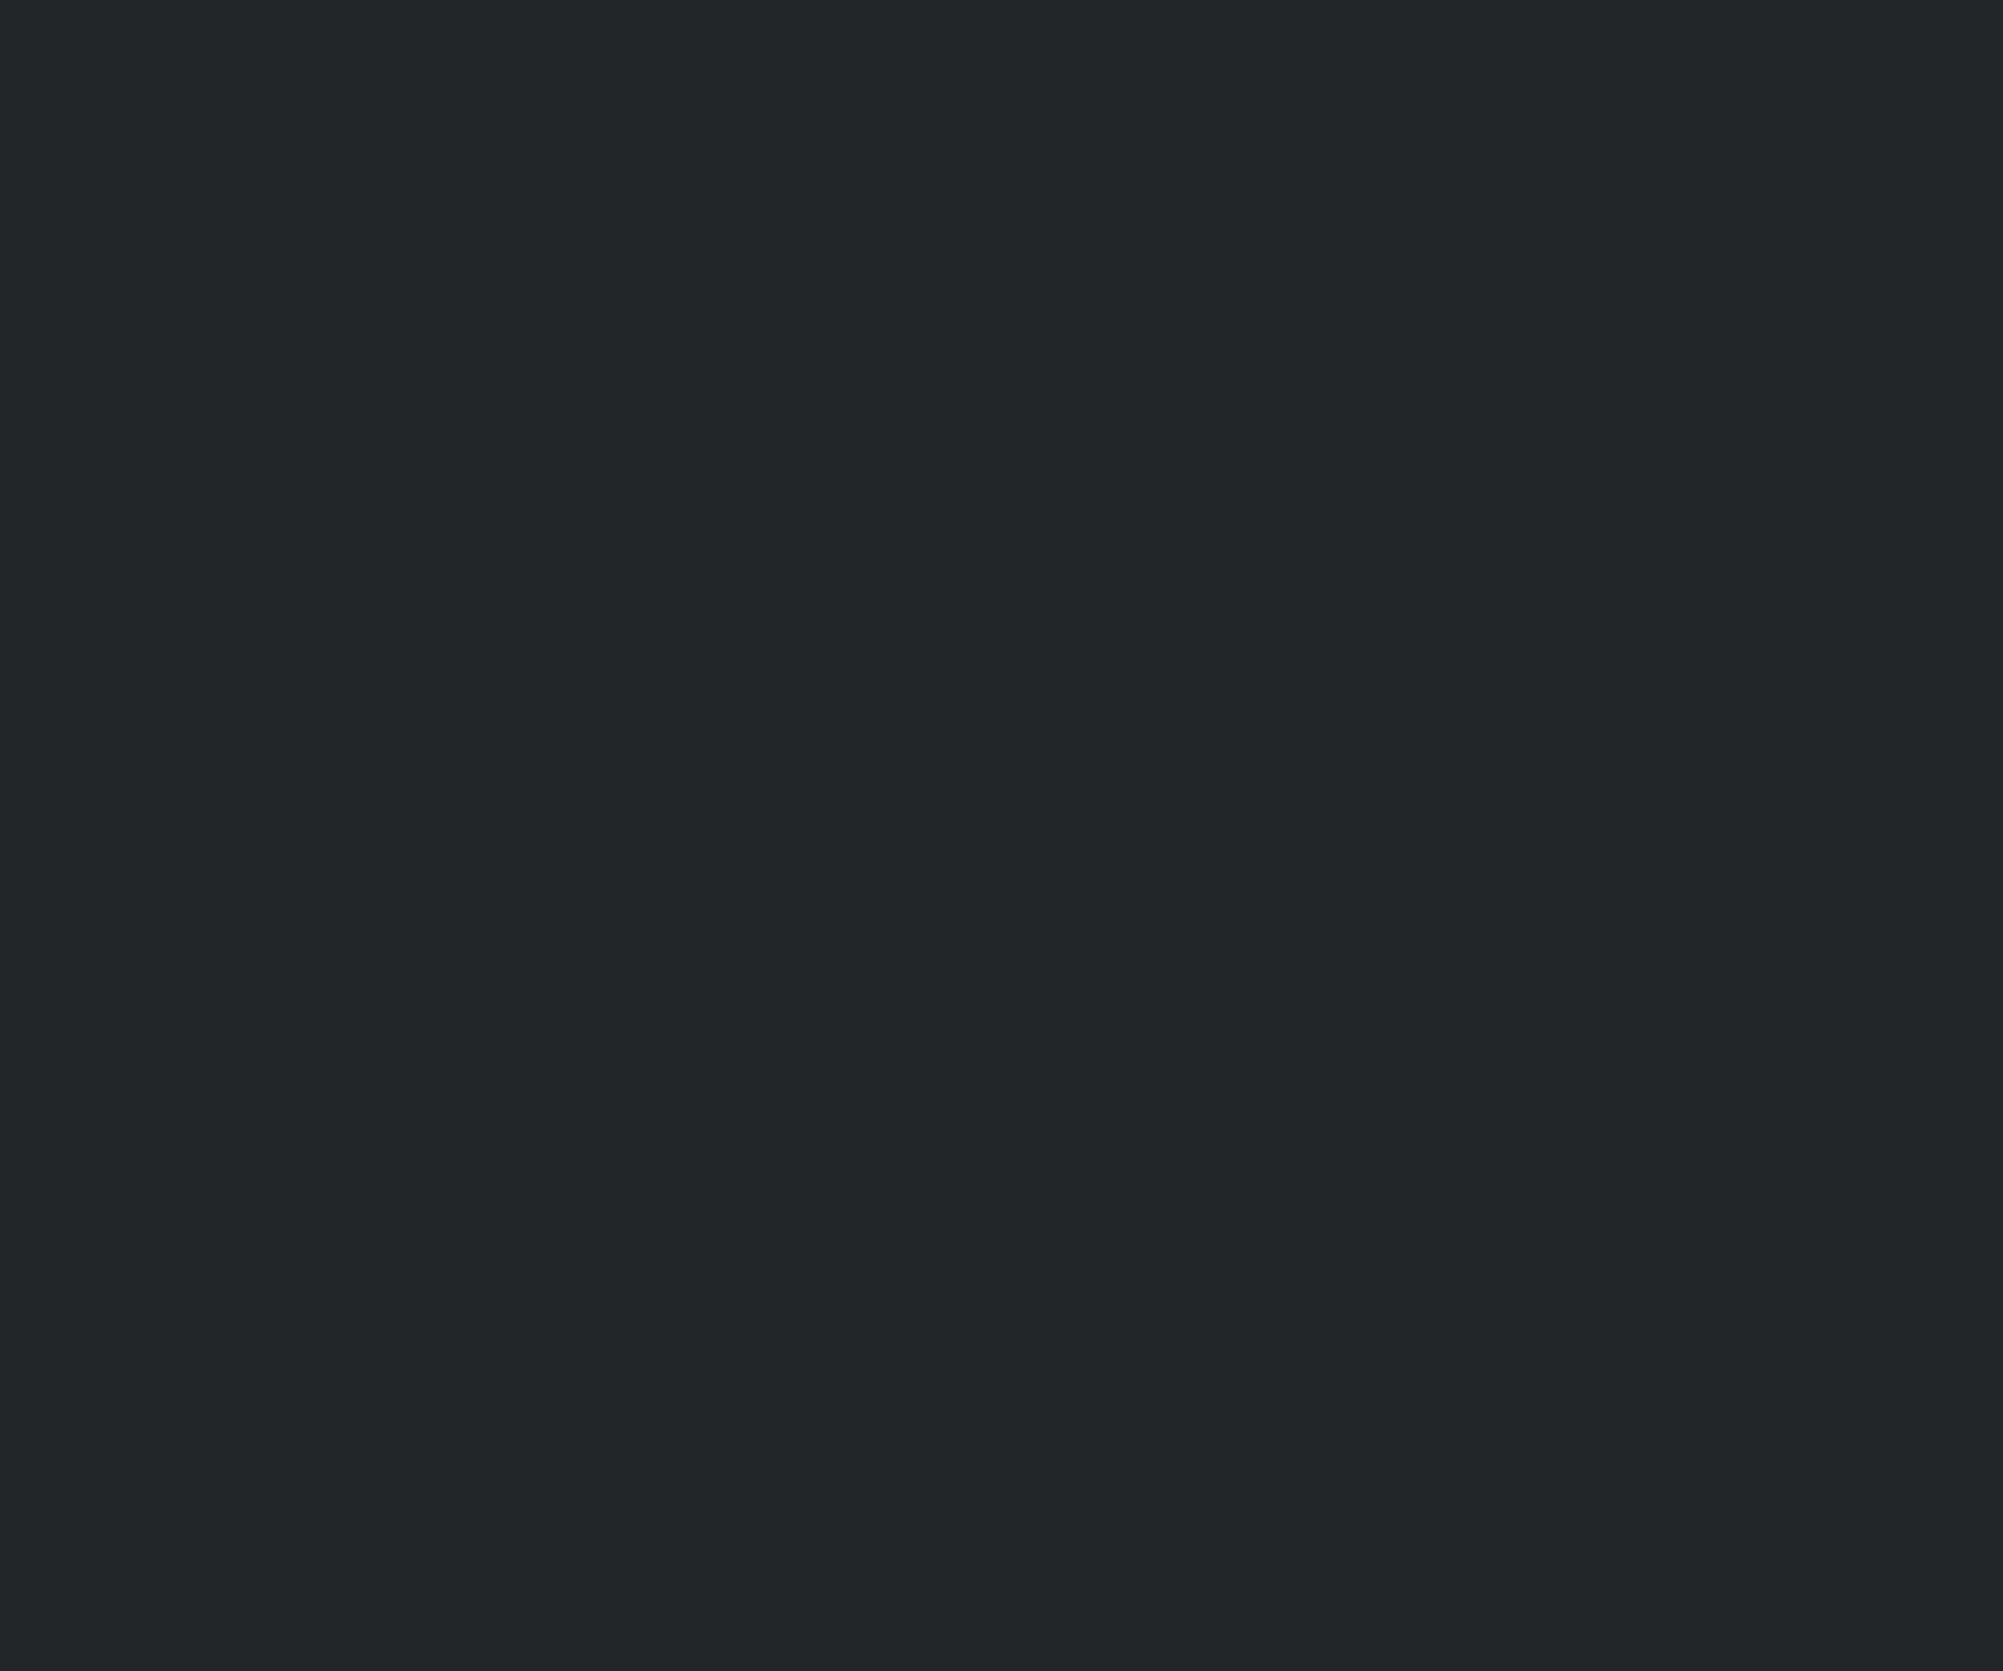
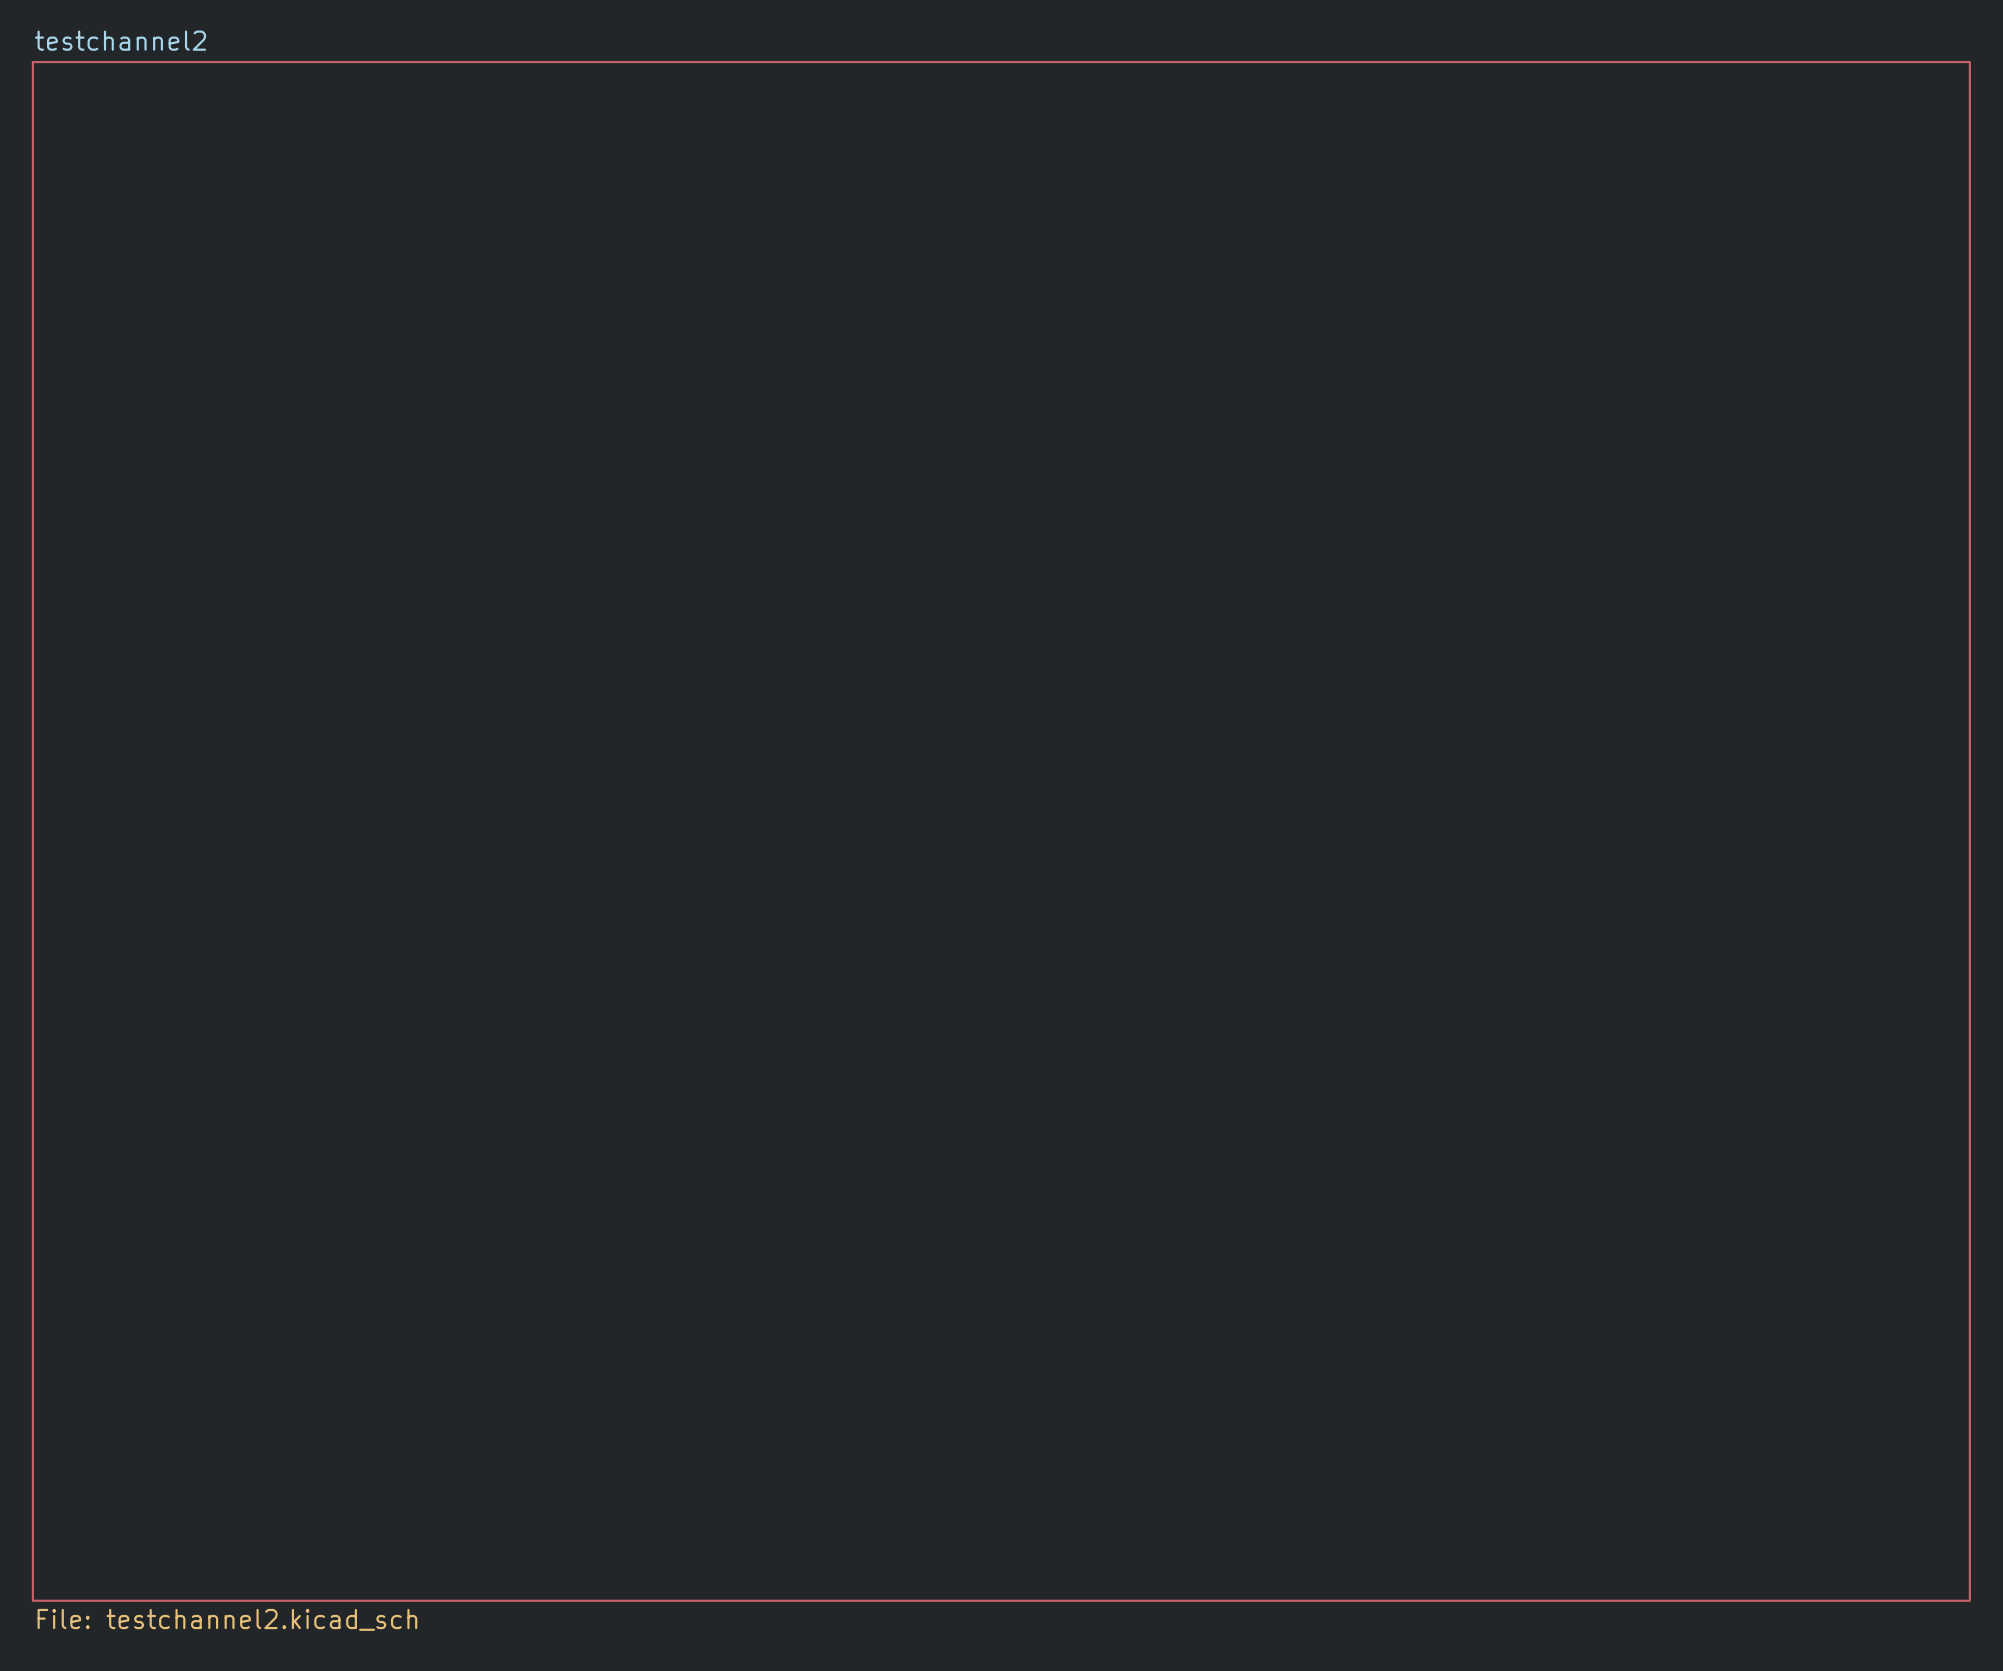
sheet testchannel2: none -> File: testchannel2.kicad_sch (1001, 831)

